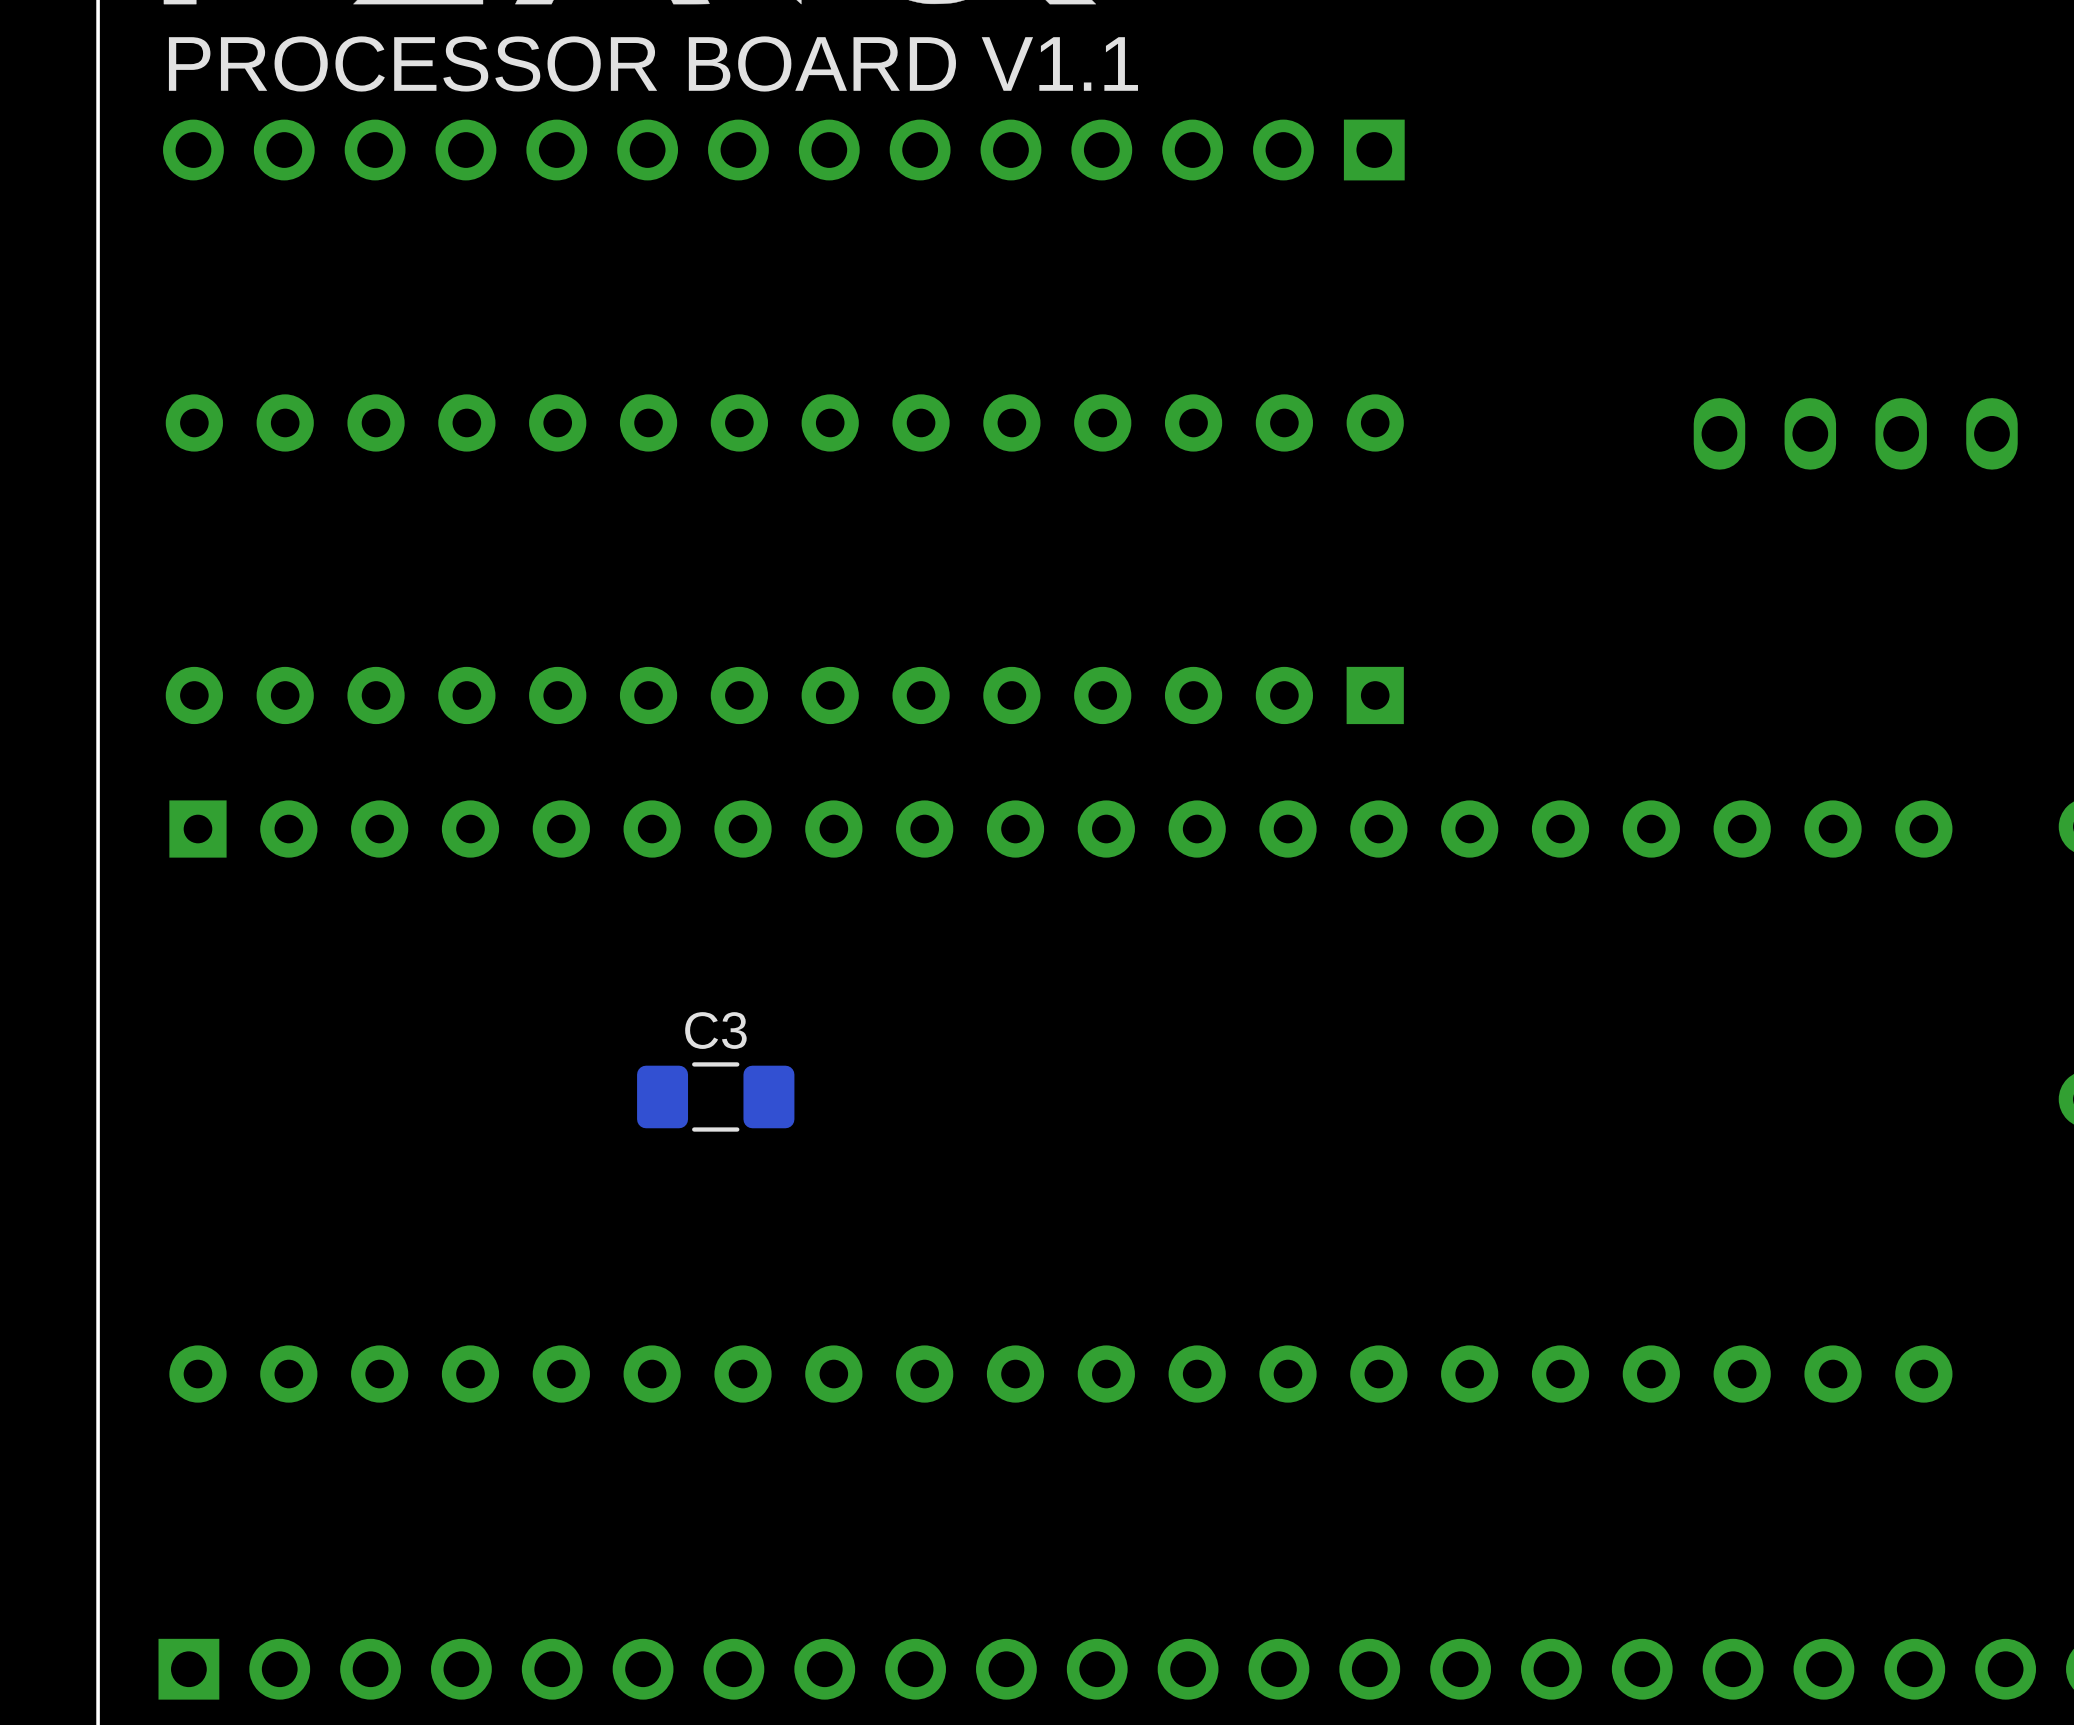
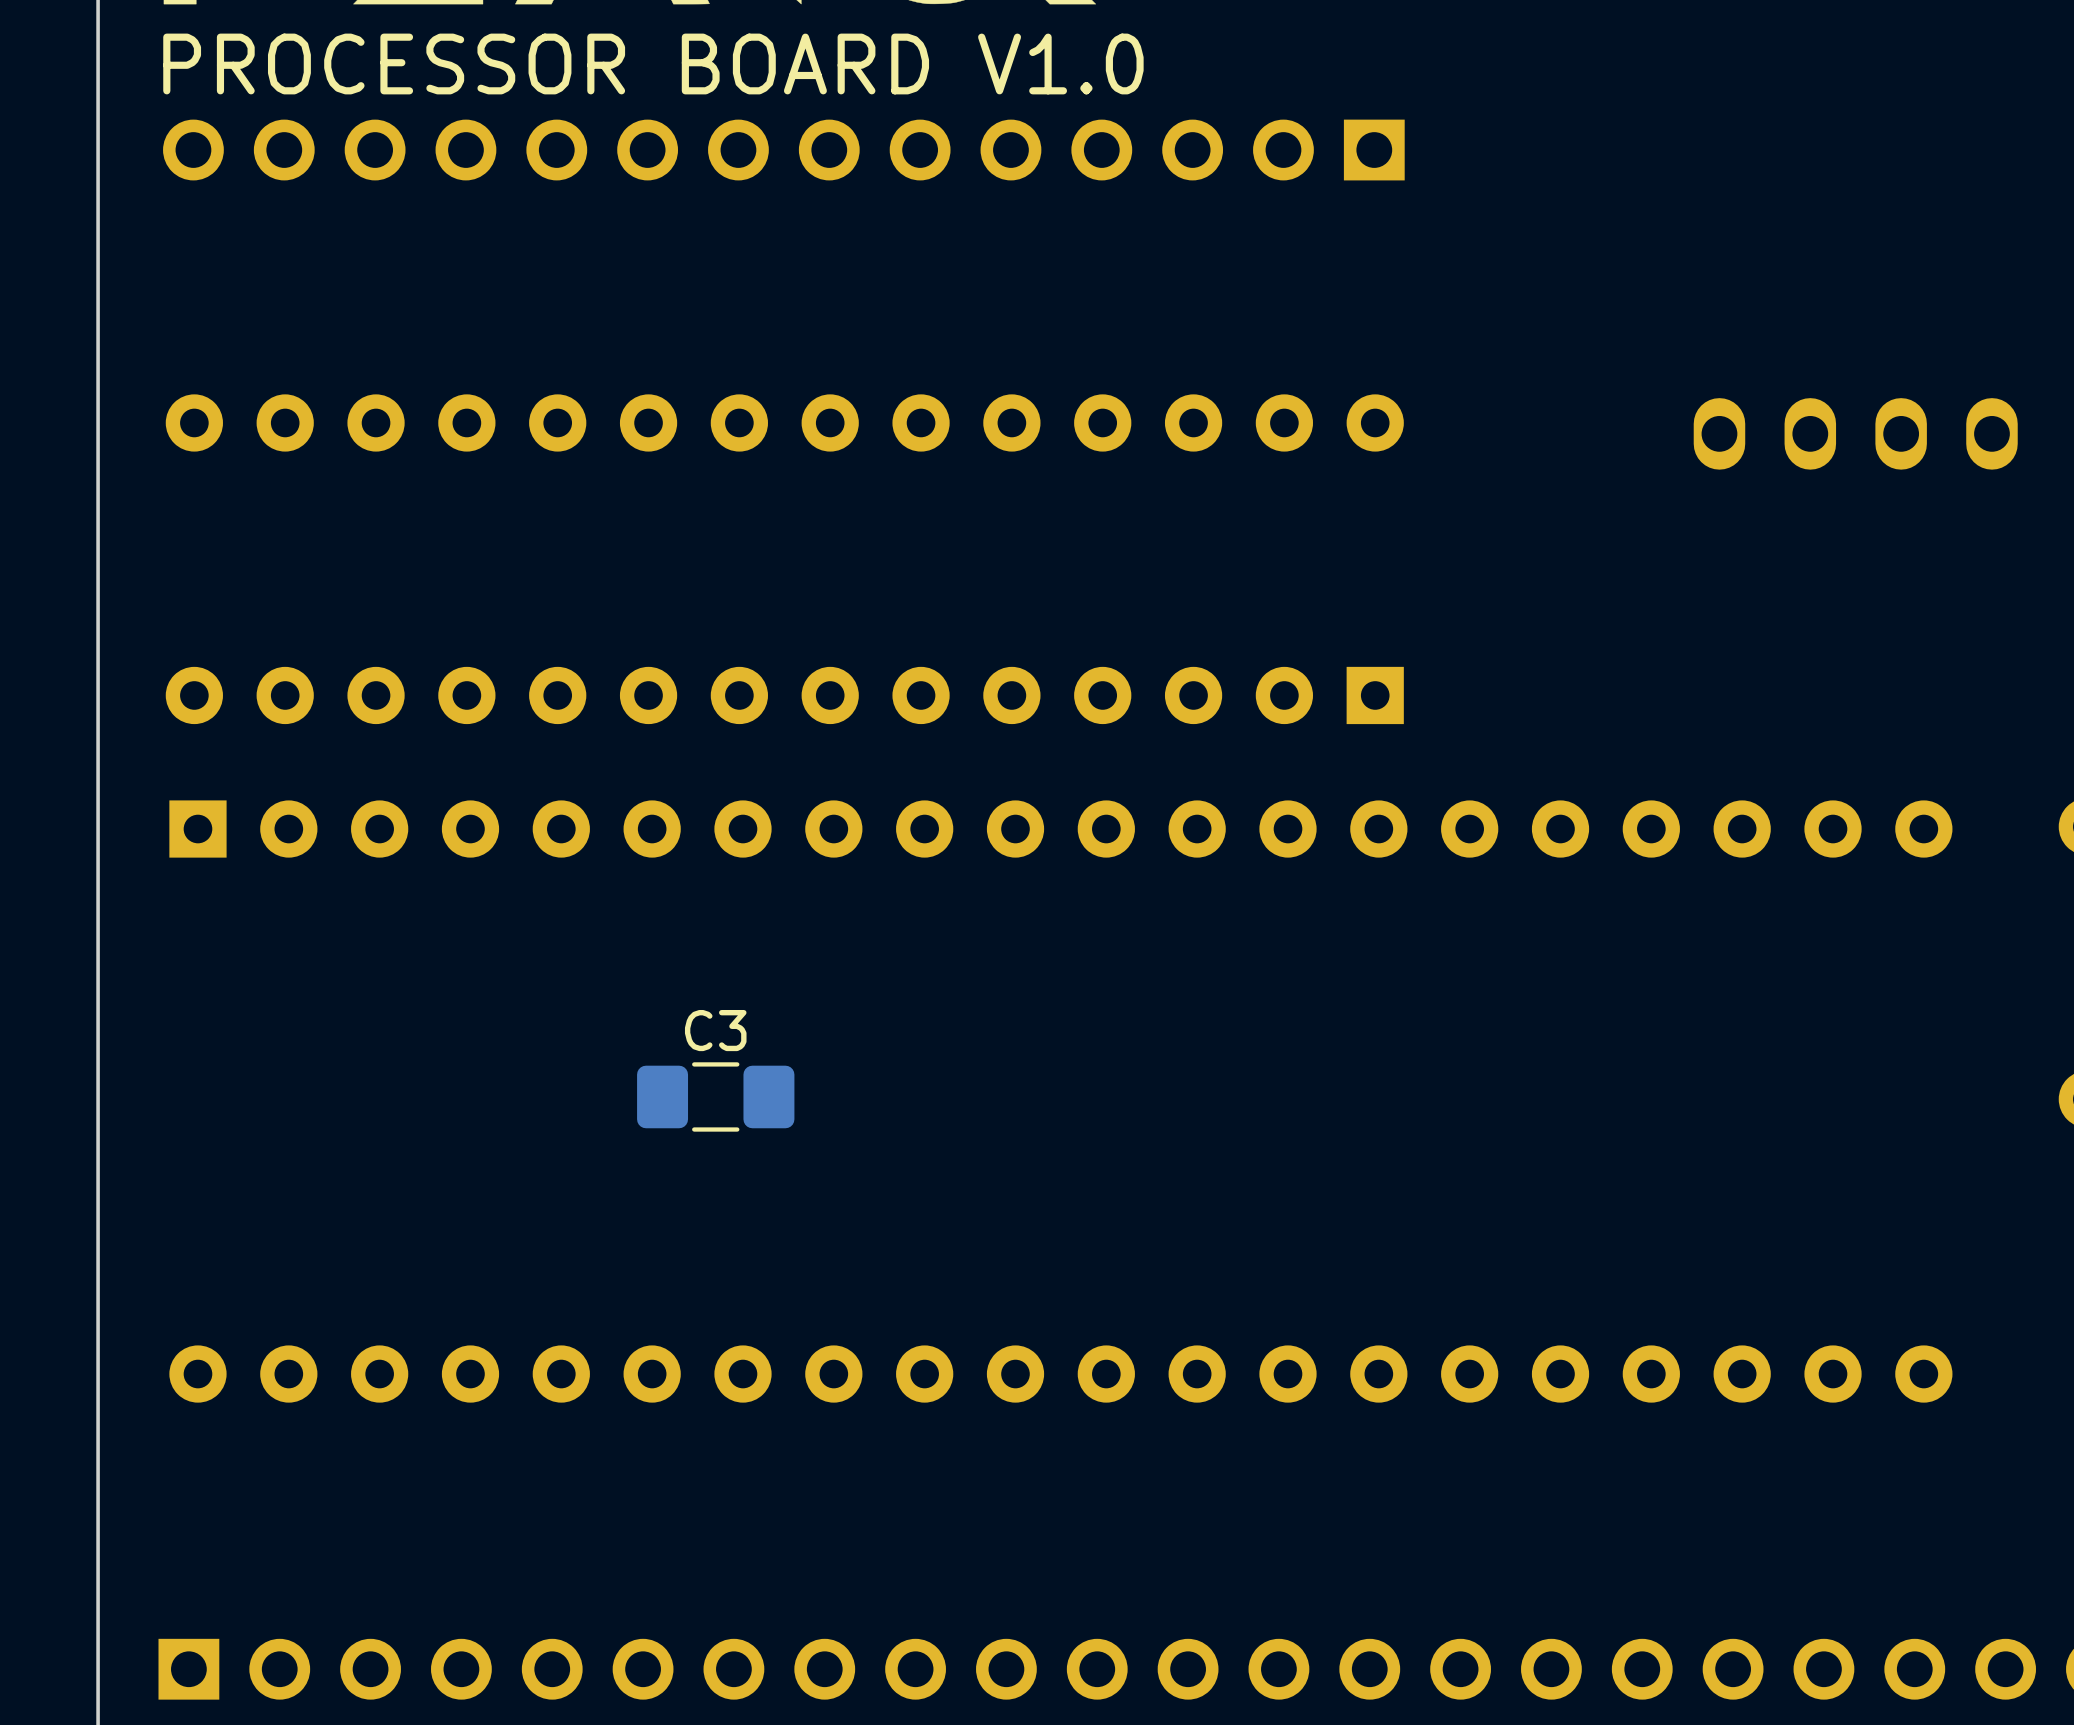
text: PROCESSOR BOARD V1.1 (653, 63) -> PROCESSOR BOARD V1.0 (653, 63)

